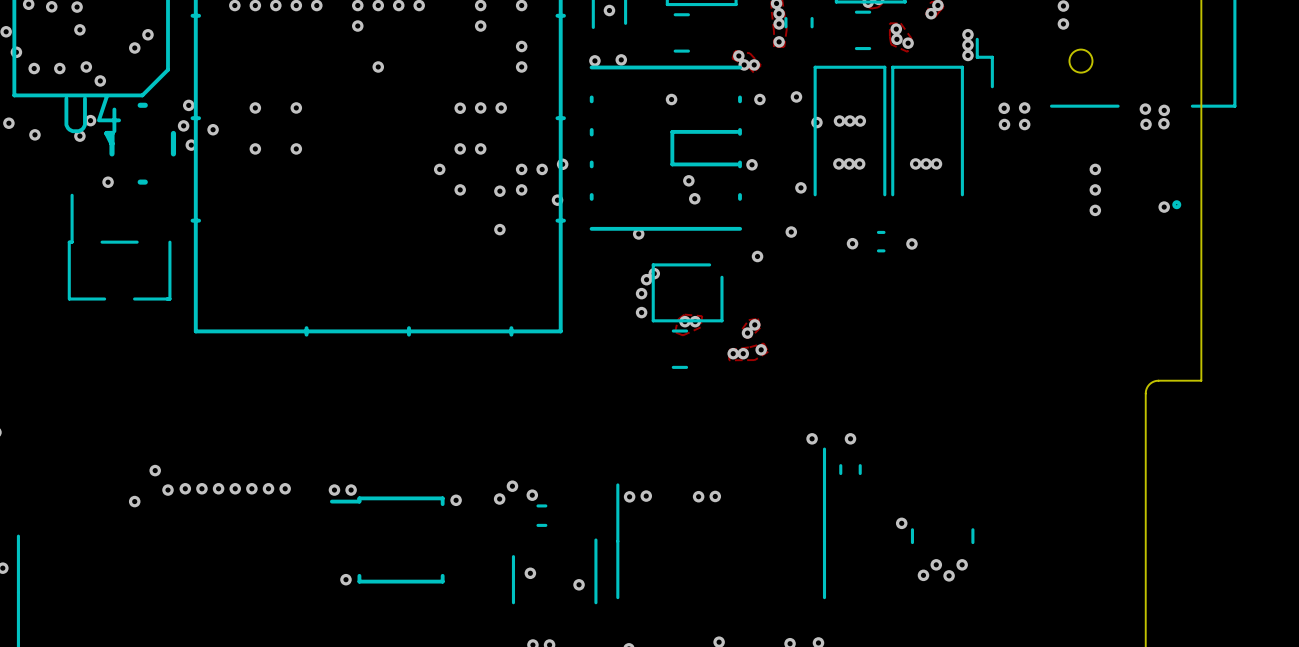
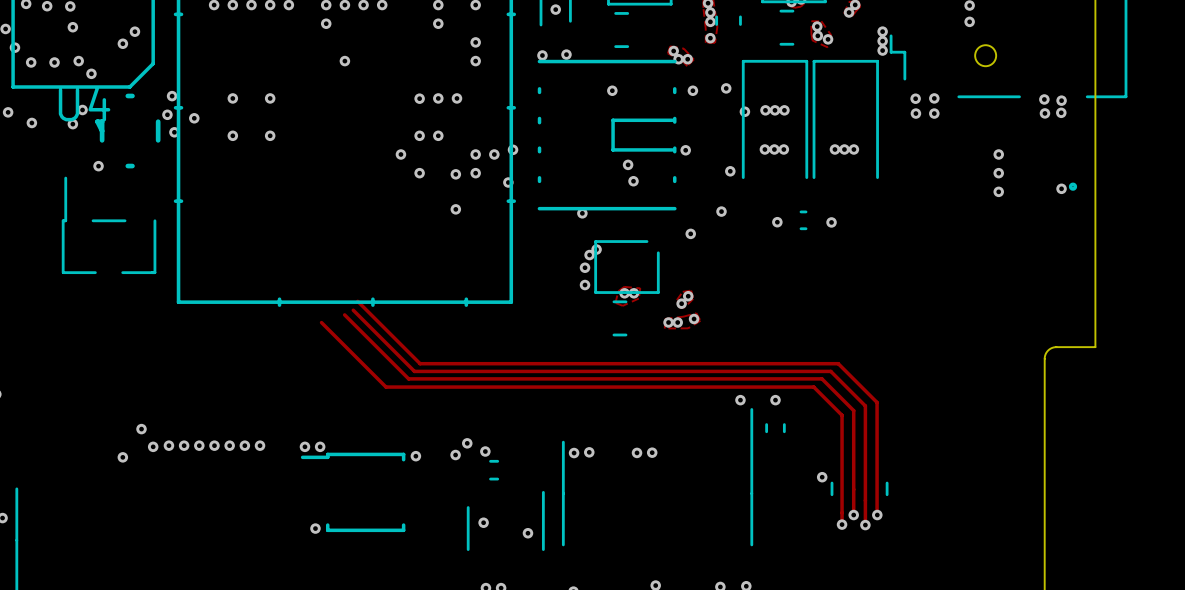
track: none -> (357, 301) (420, 363) (838, 363) (877, 402) (877, 514)
track: none -> (353, 310) (414, 371) (830, 371) (865, 405) (865, 525)
track: none -> (344, 314) (408, 378) (821, 378) (853, 410) (853, 515)
track: none -> (321, 322) (386, 387) (813, 387) (842, 415) (842, 524)

